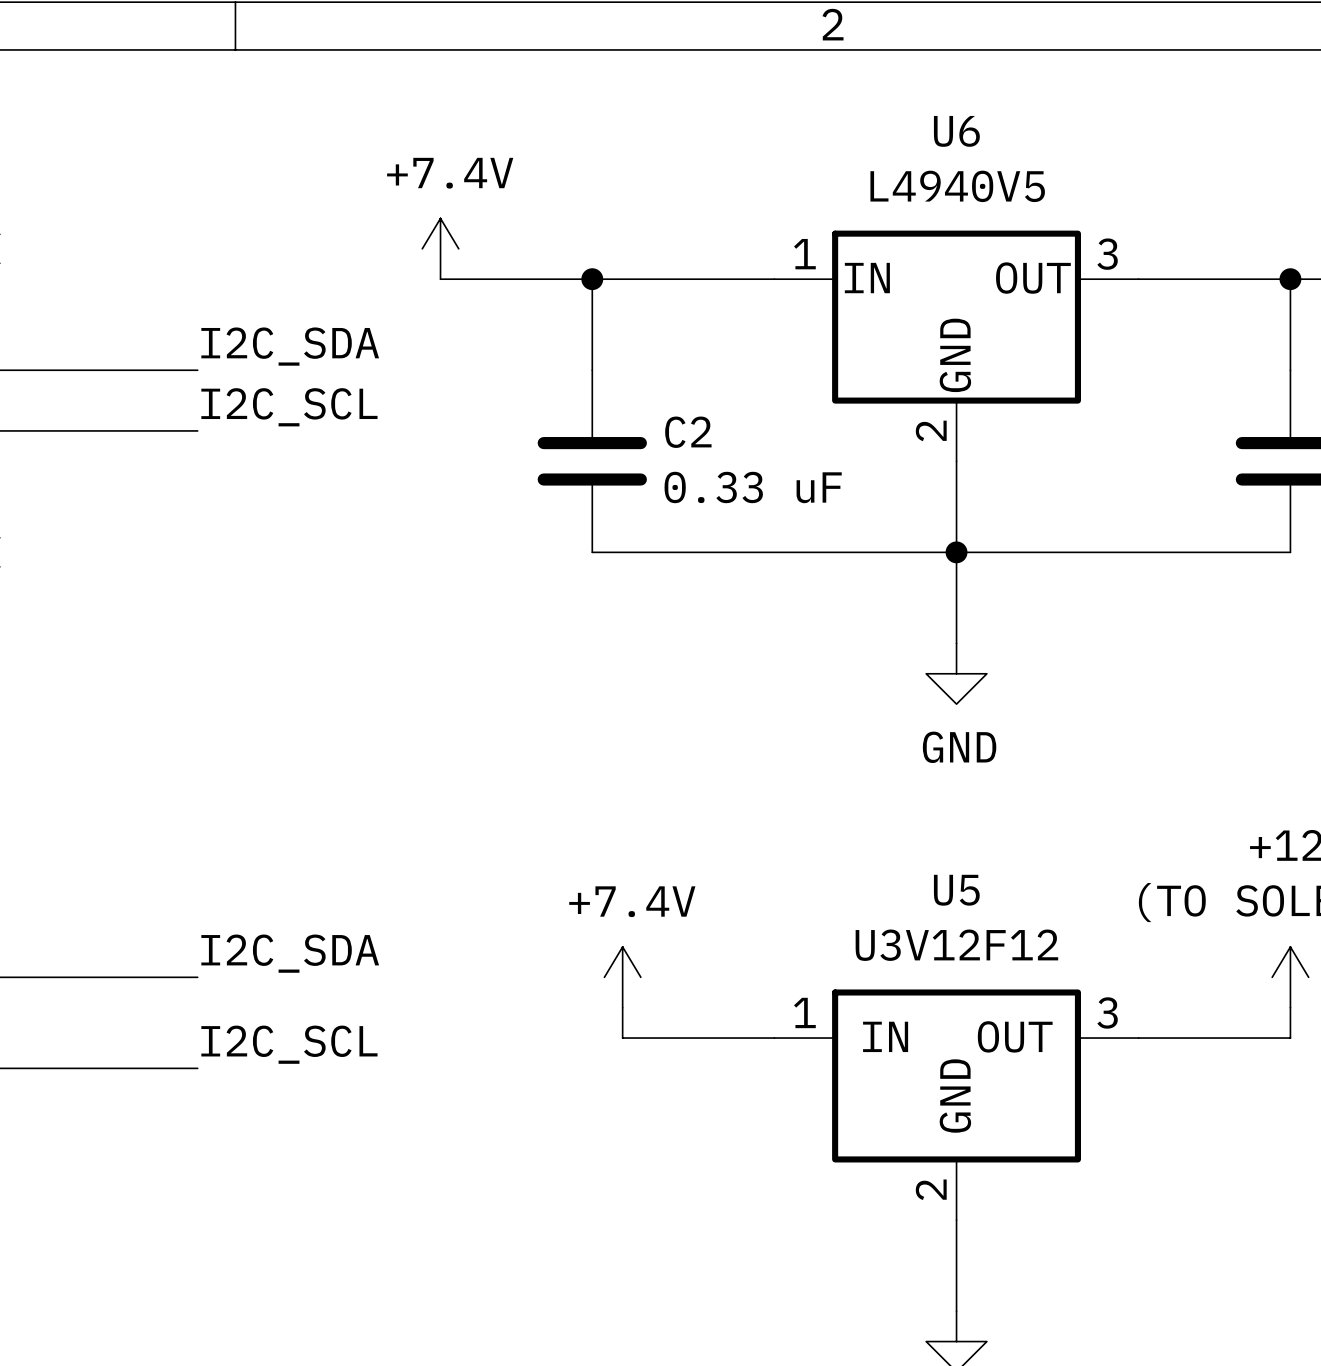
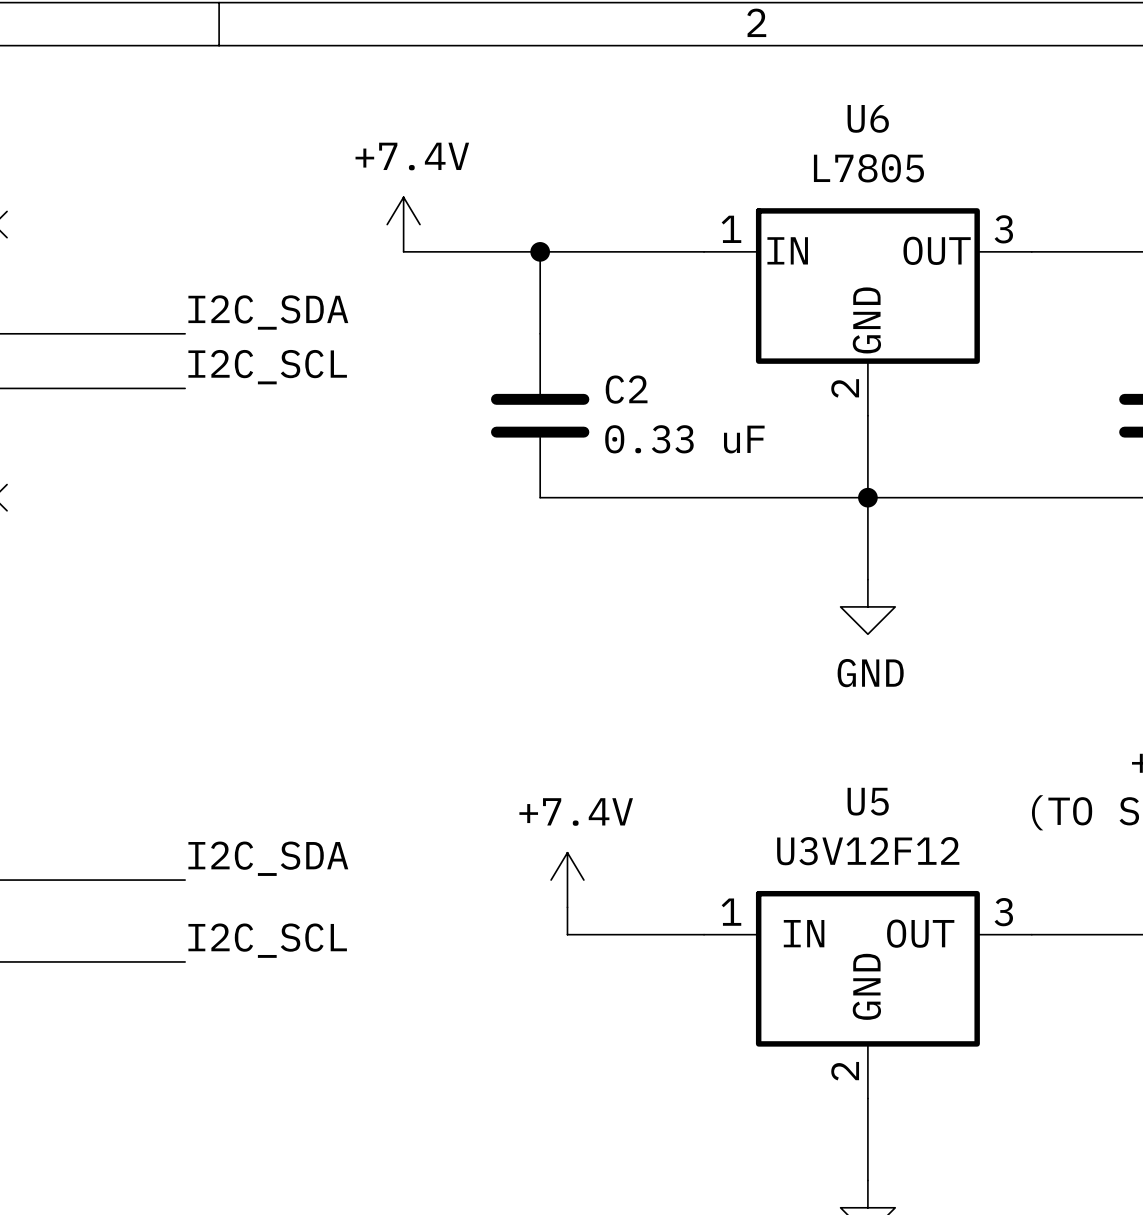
U6 value: L4940V5 (957, 186) -> L7805 (868, 168)

